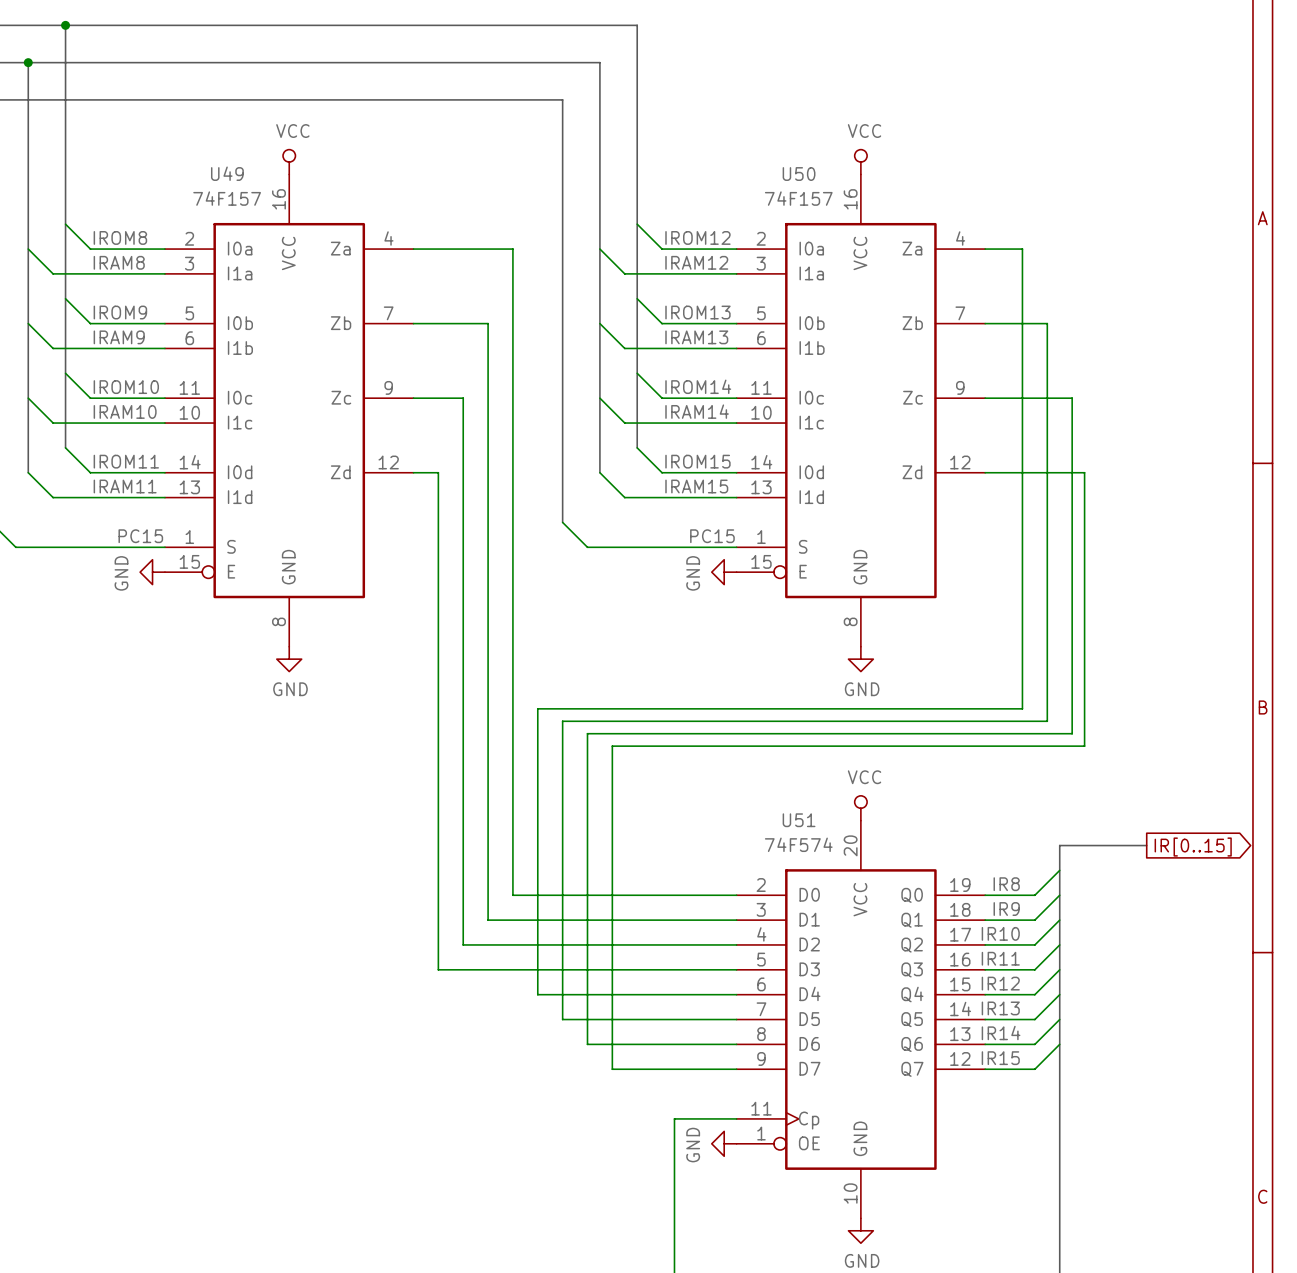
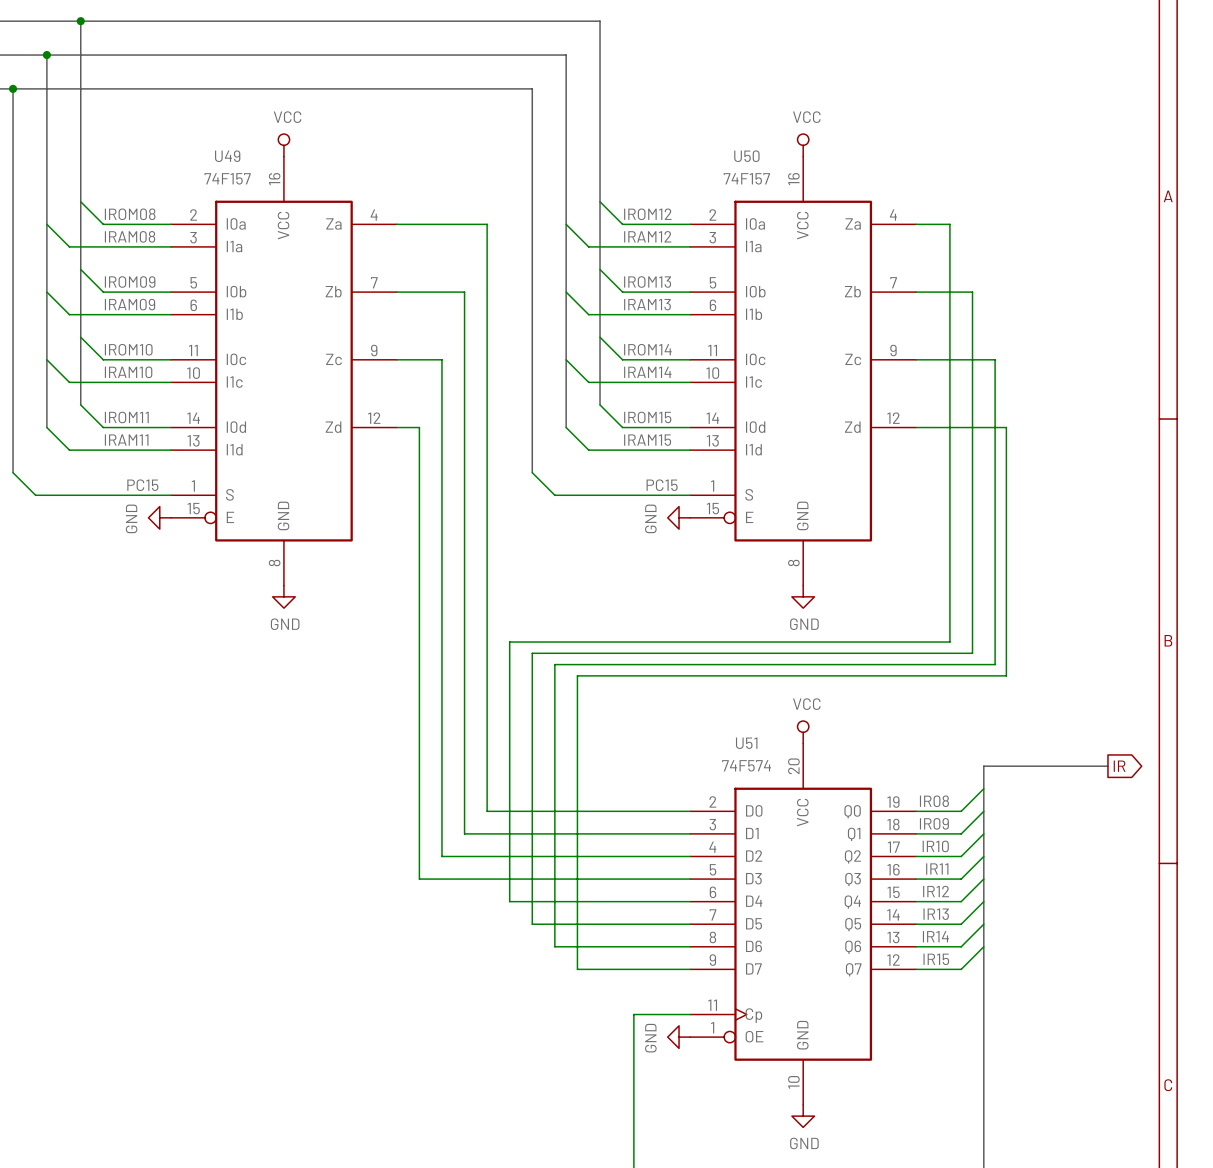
label: IROM8 (120, 237) -> IROM08 (130, 214)
label: IRAM8 (119, 262) -> IRAM08 (130, 236)
label: IROM9 (120, 312) -> IROM09 (130, 282)
label: IRAM9 (119, 337) -> IRAM09 (130, 304)
bus: none -> (1062, 766) (1107, 766)
global label: none -> IR (1119, 766)
global label: IR[0..15] (1193, 847) -> none
label: IR8 (1006, 884) -> IR08 (934, 801)
label: IR9 (1006, 909) -> IR09 (934, 823)

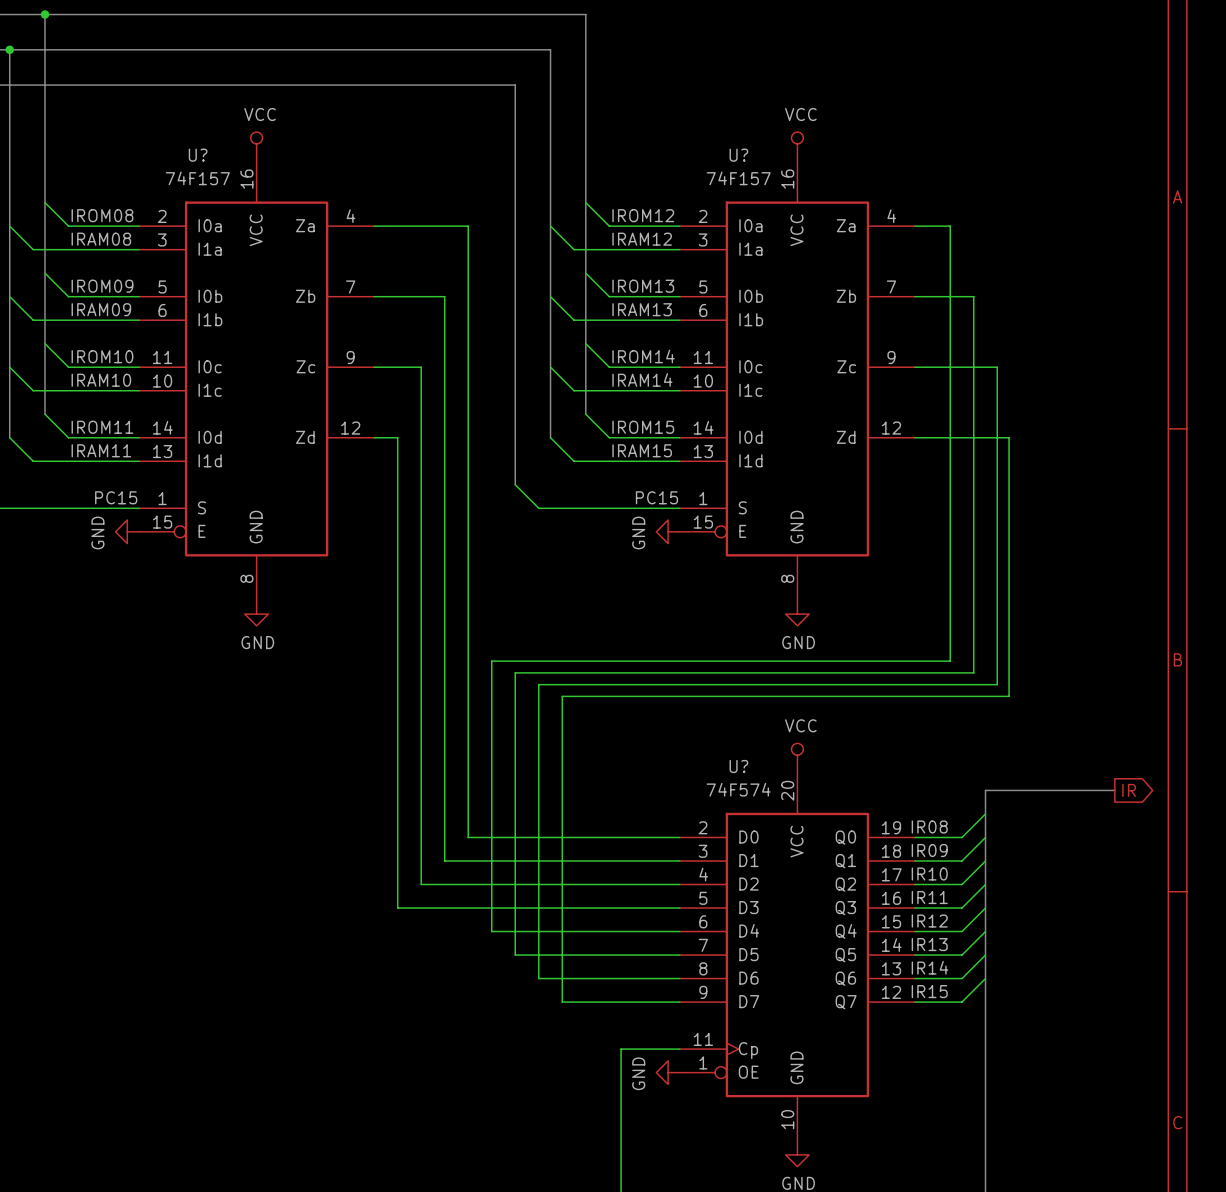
U49 name: U49 (227, 156) -> U? (198, 155)
U50 name: U50 (746, 156) -> U? (738, 155)
U51 name: U51 (746, 743) -> U? (738, 766)

